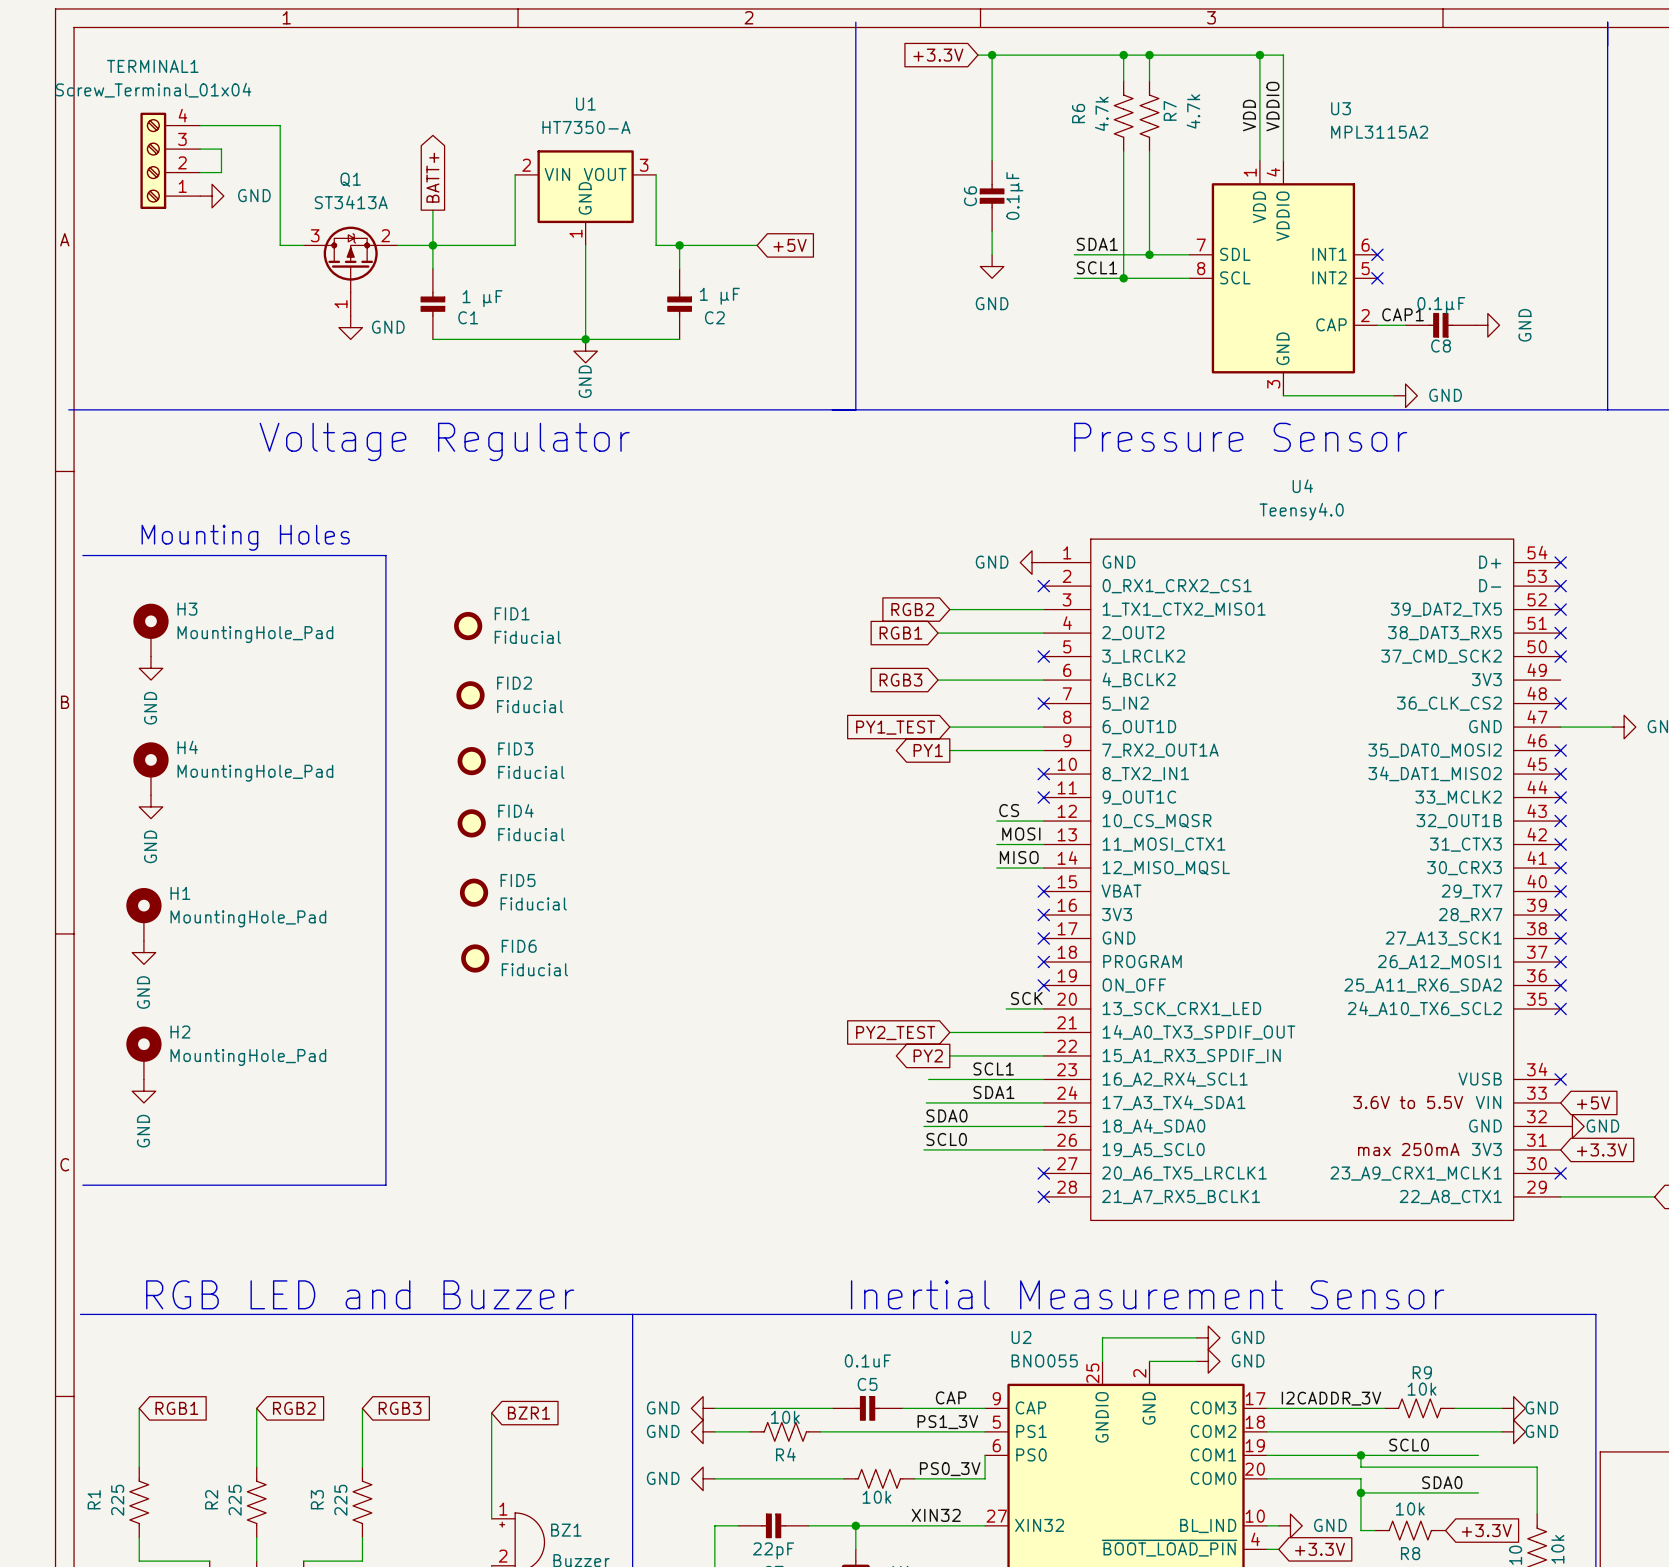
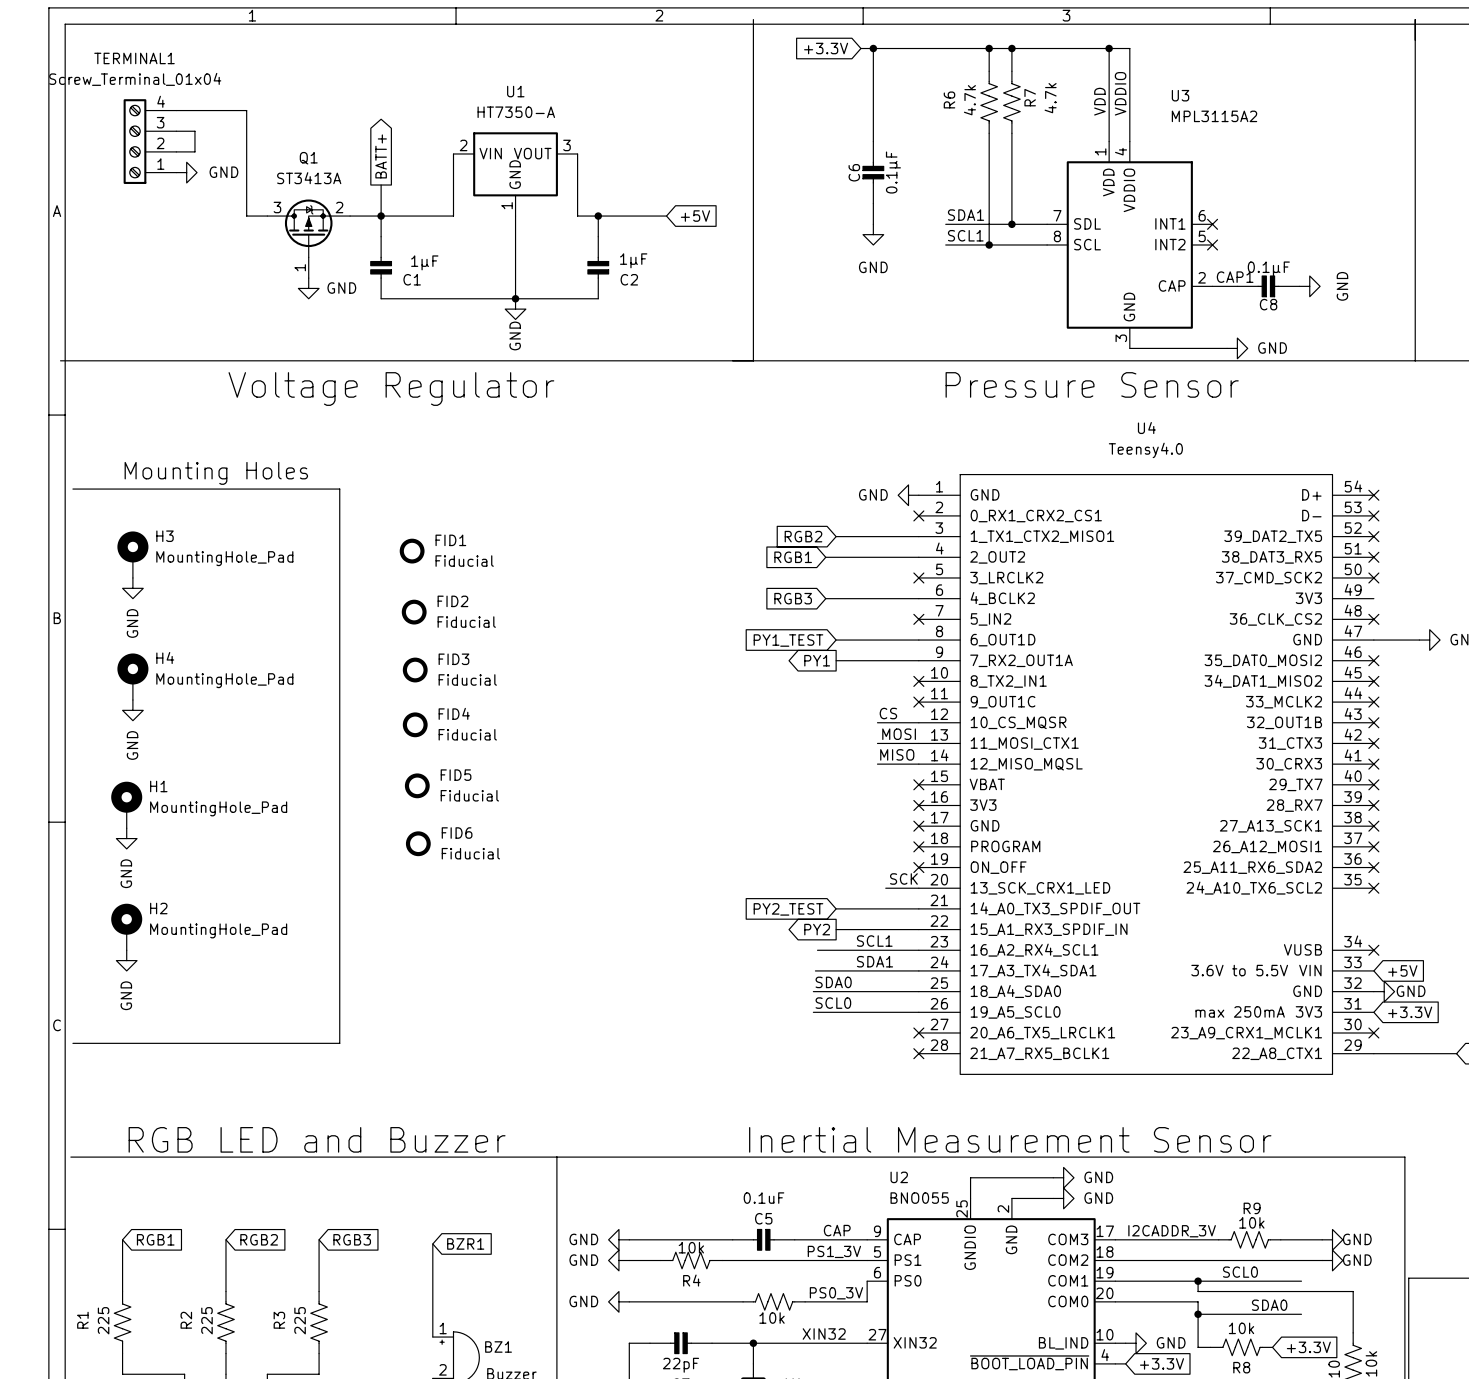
C2 value: 1 µF (719, 296) -> 1µF (633, 260)
C1 value: 1 µF (482, 298) -> 1µF (424, 262)

